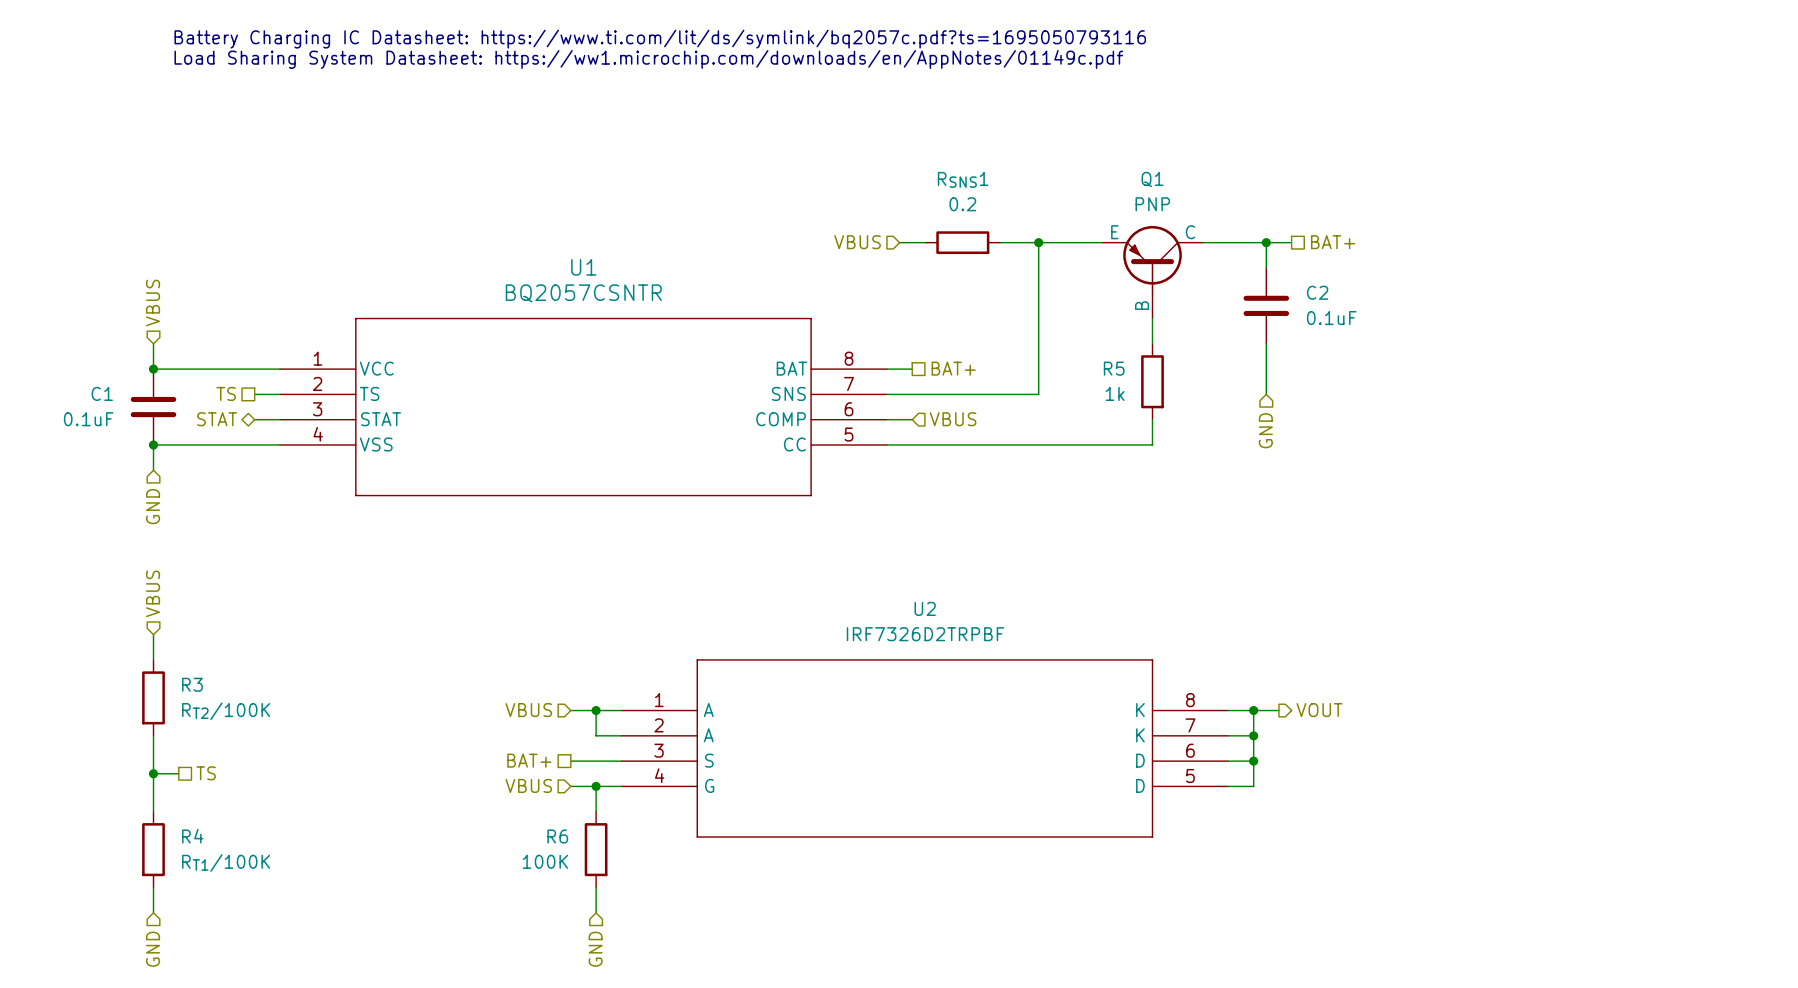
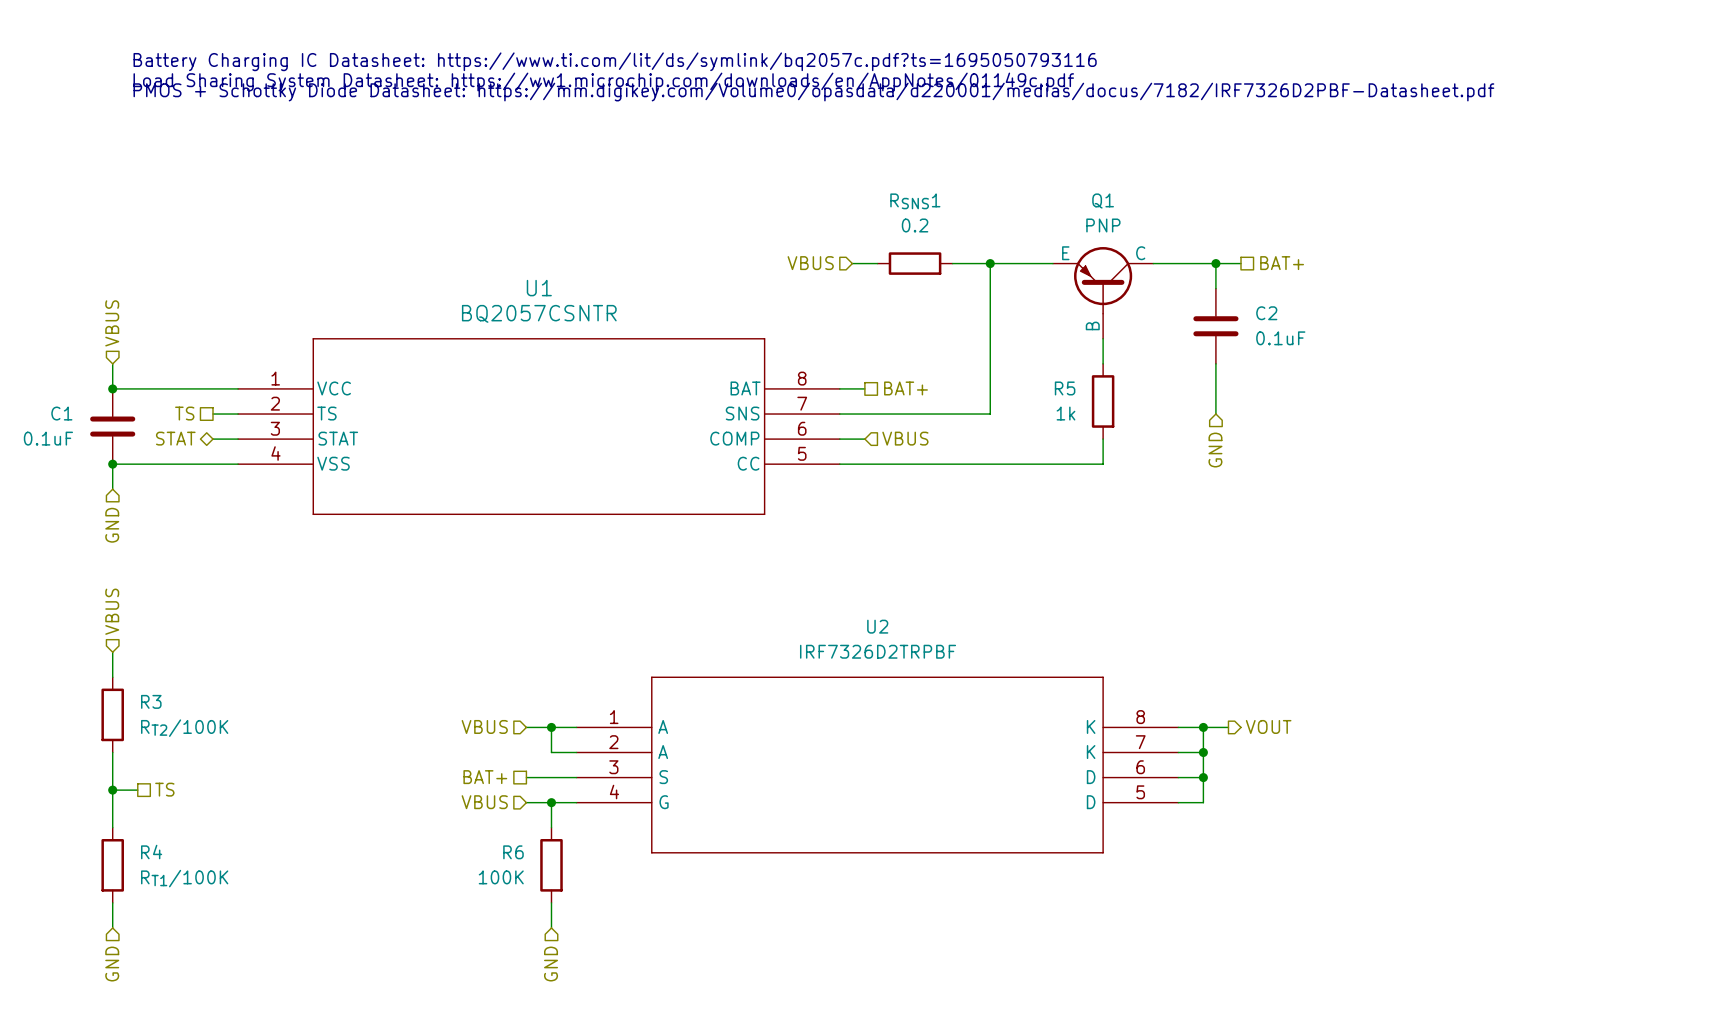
text: none -> PMOS + Schottky Diode Datasheet: https://mm.digikey.com/Volume0/opasdata/d220001/medias/docus/7182/IRF7326D2PBF-Datasheet.pdf (813, 92)

